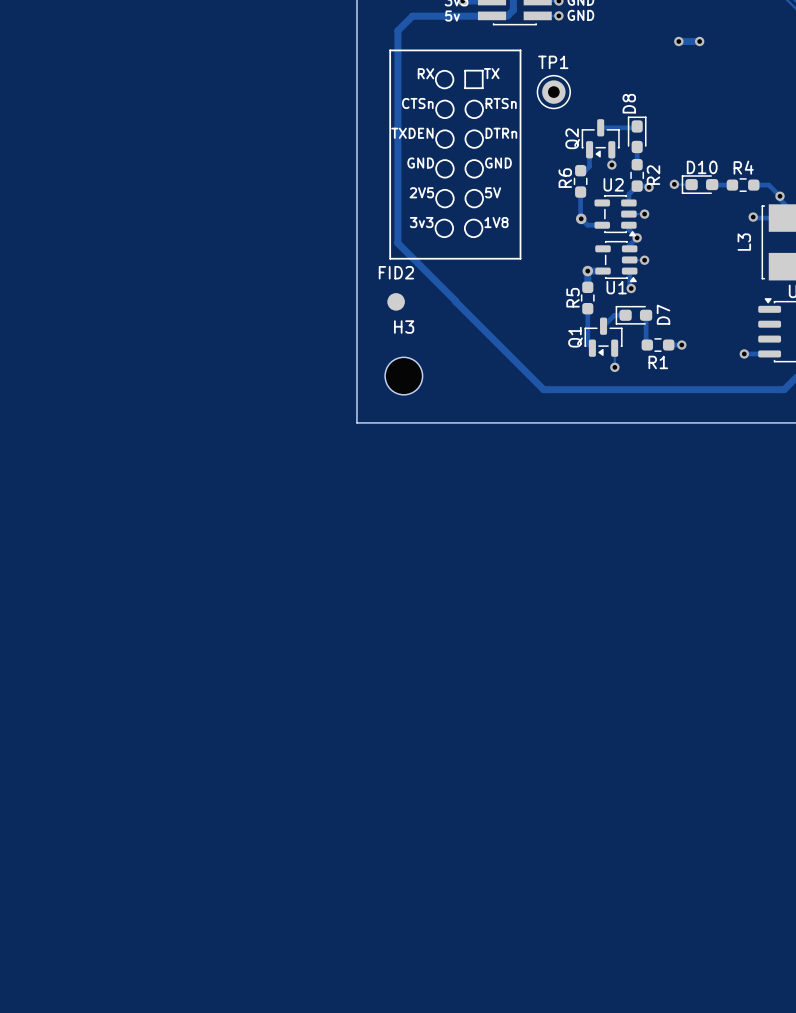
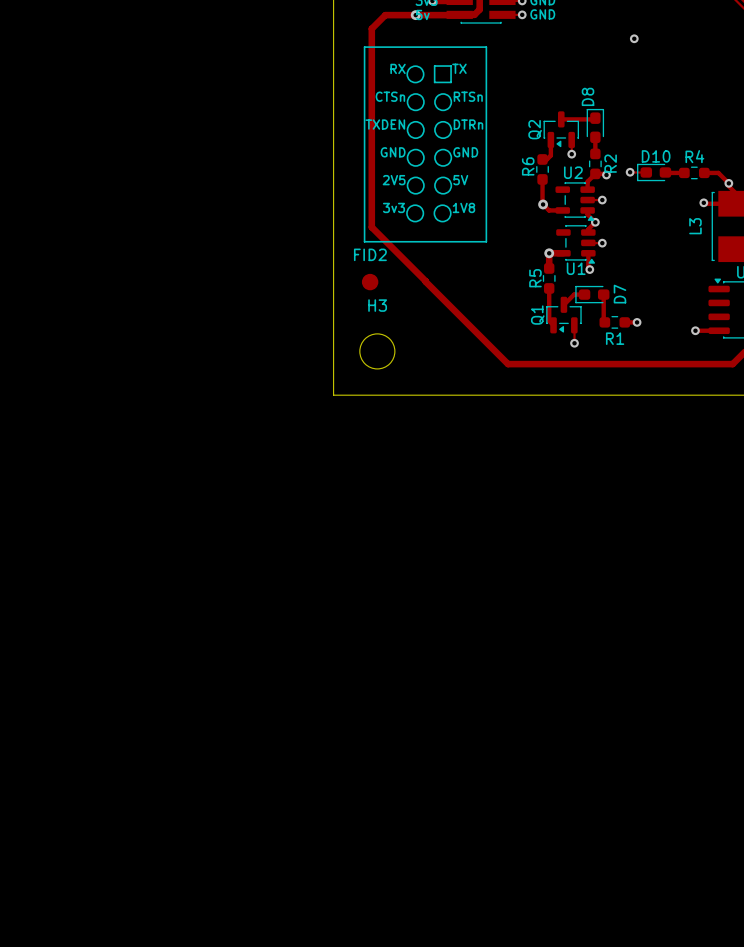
via: none -> (415, 15)
track: (678, 41) (699, 41) -> none
via: (699, 41) -> none
TP1: (553, 92) -> none

